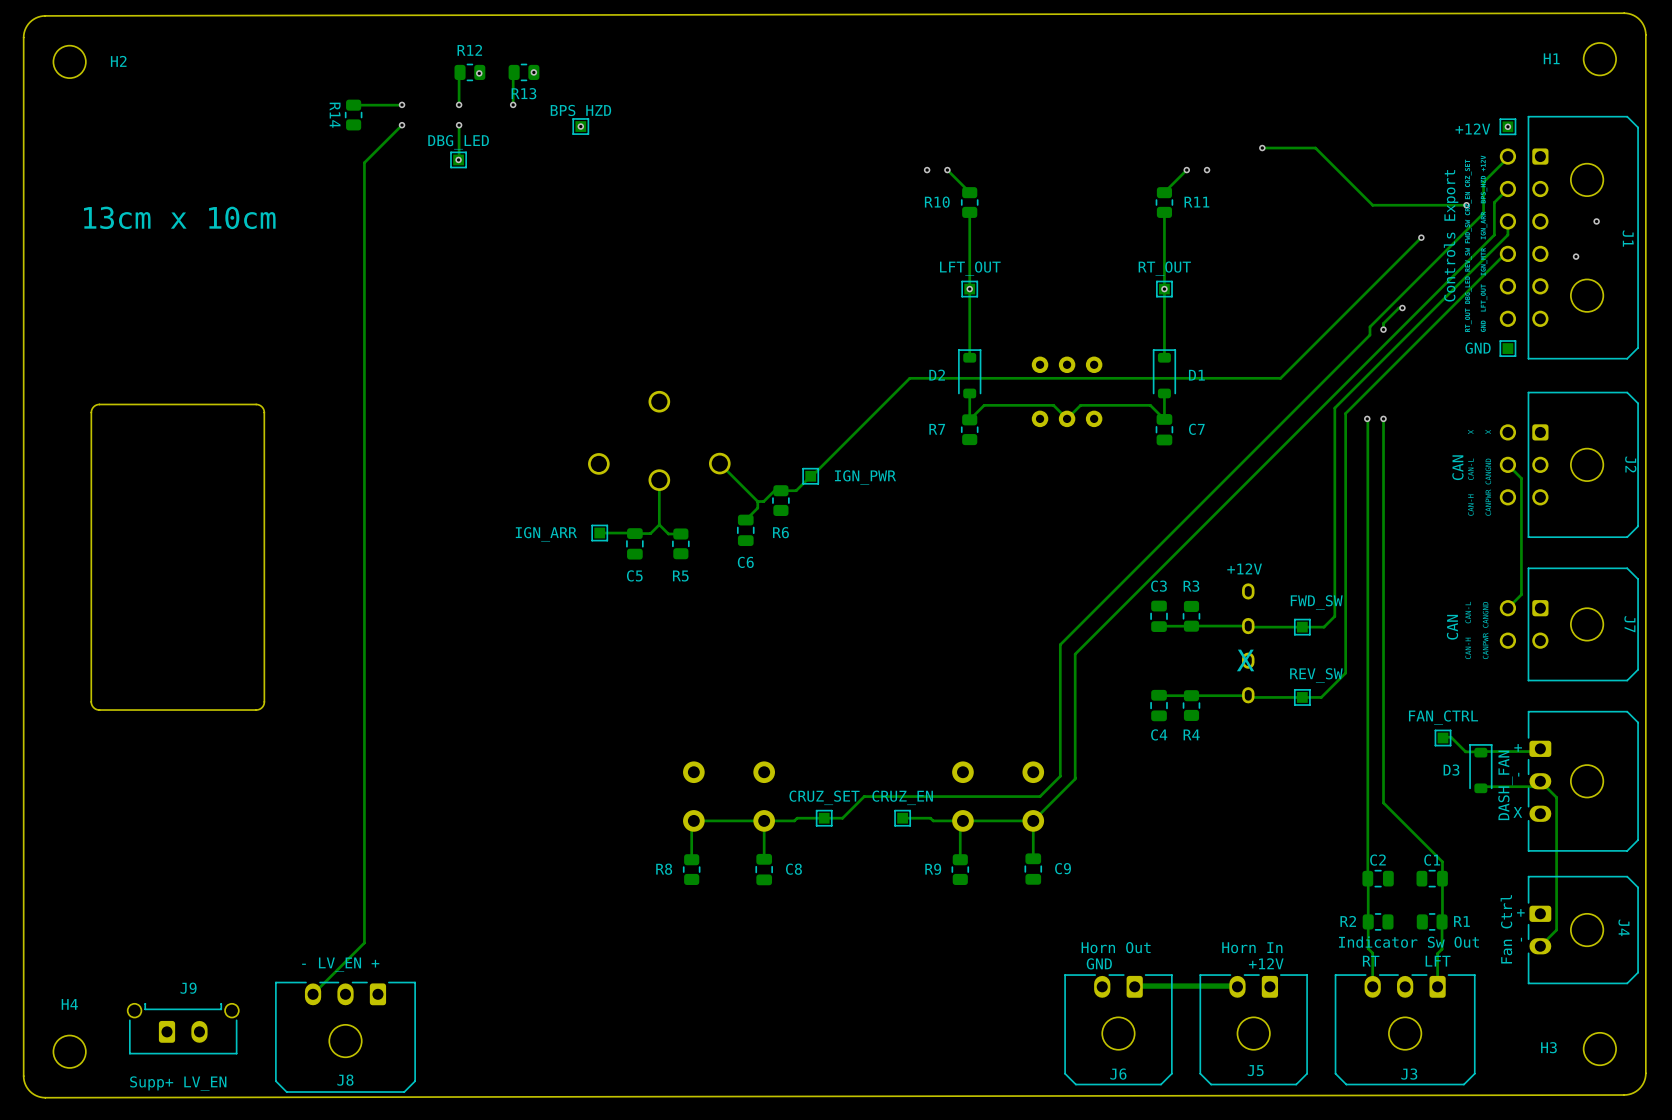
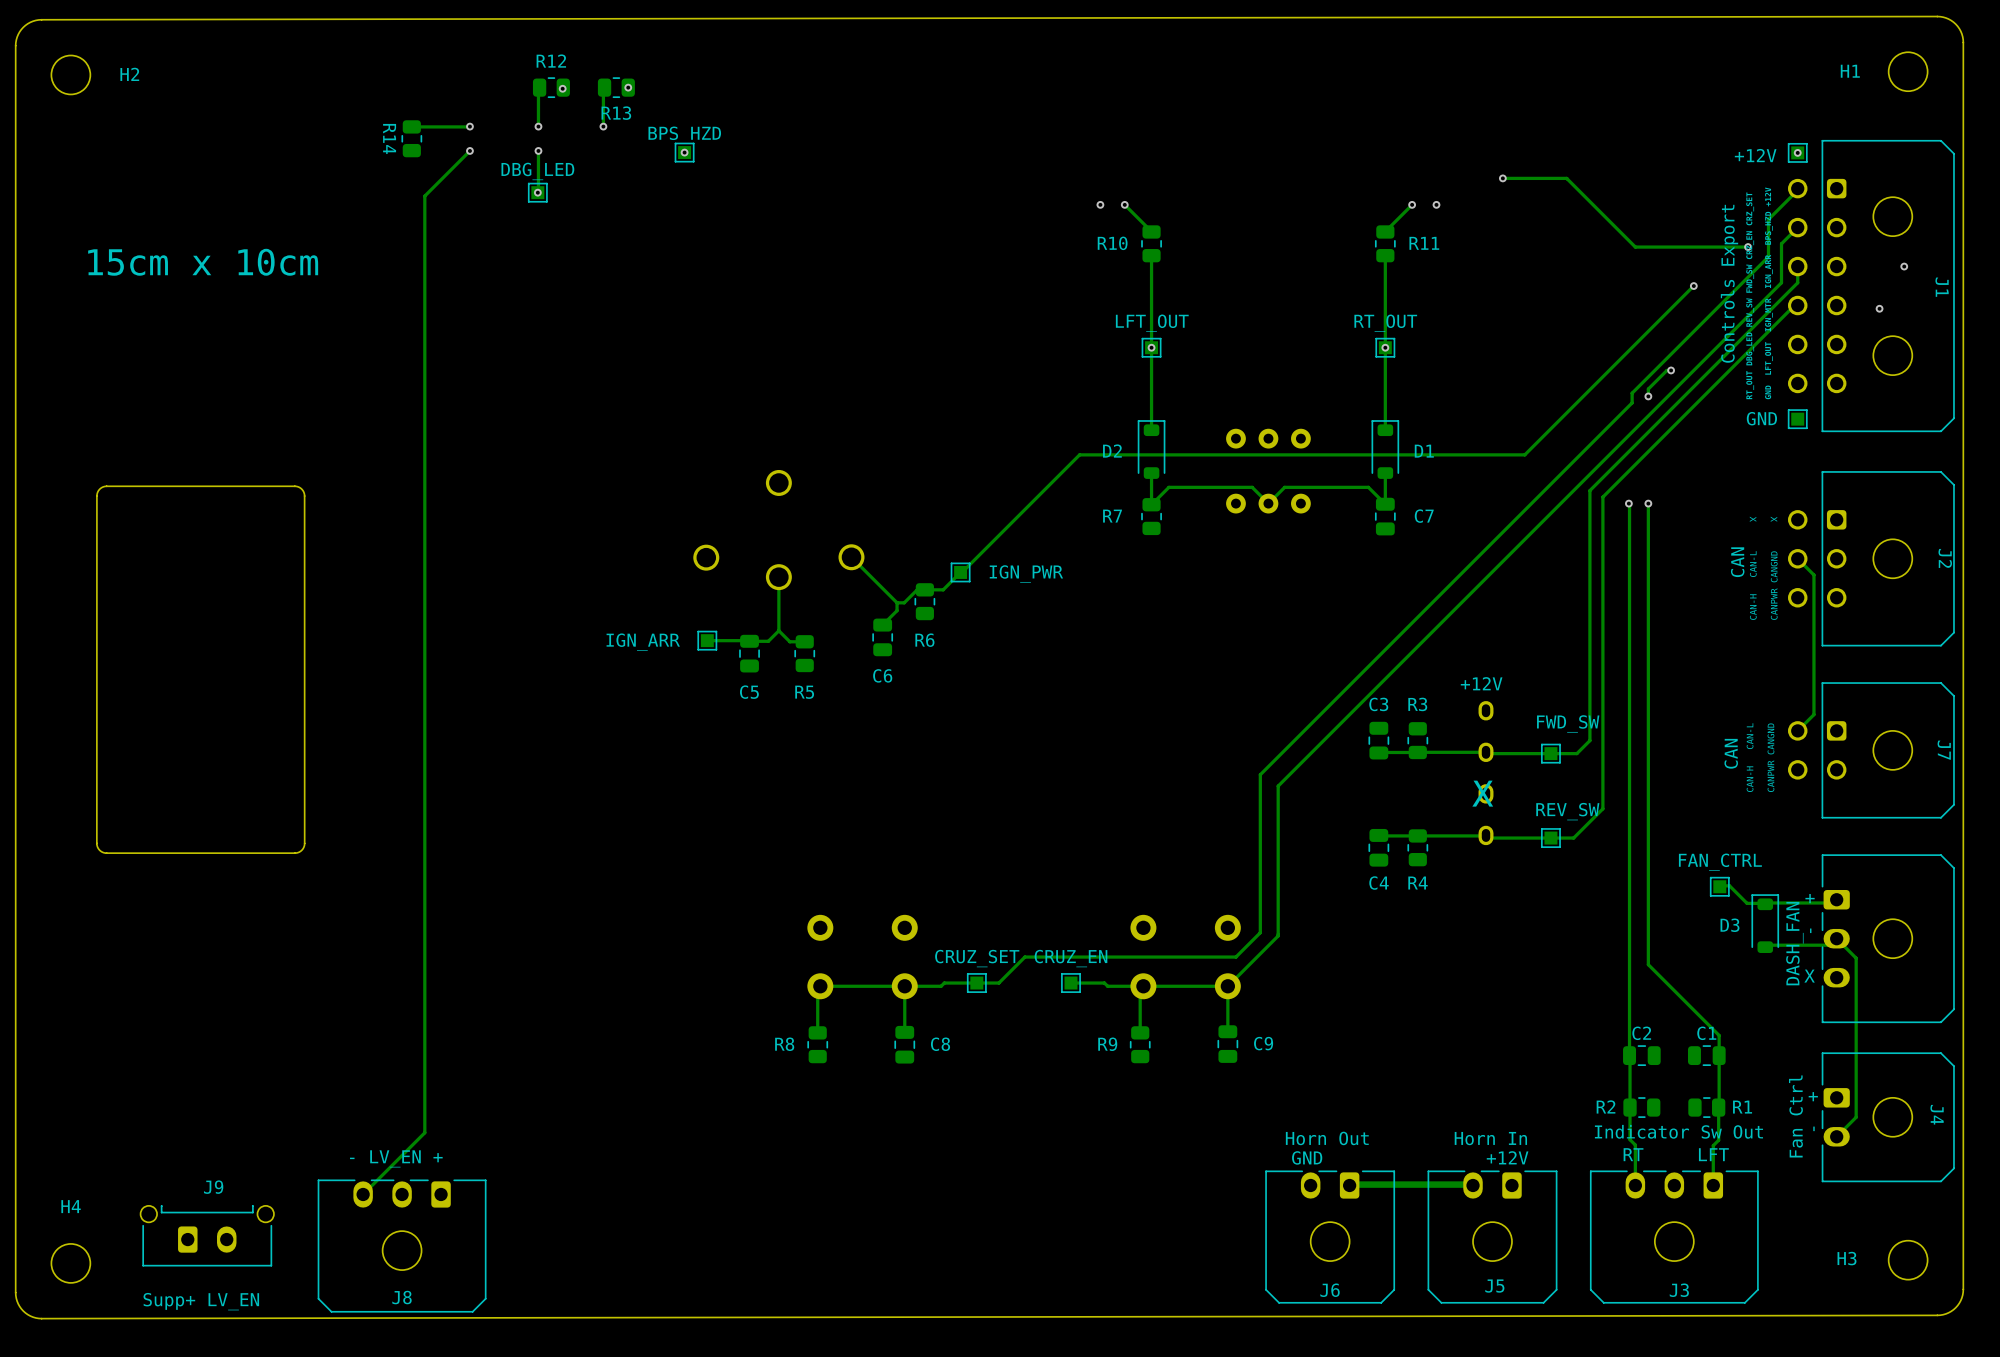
text: 13cm x 10cm (179, 217) -> 15cm x 10cm (203, 262)

